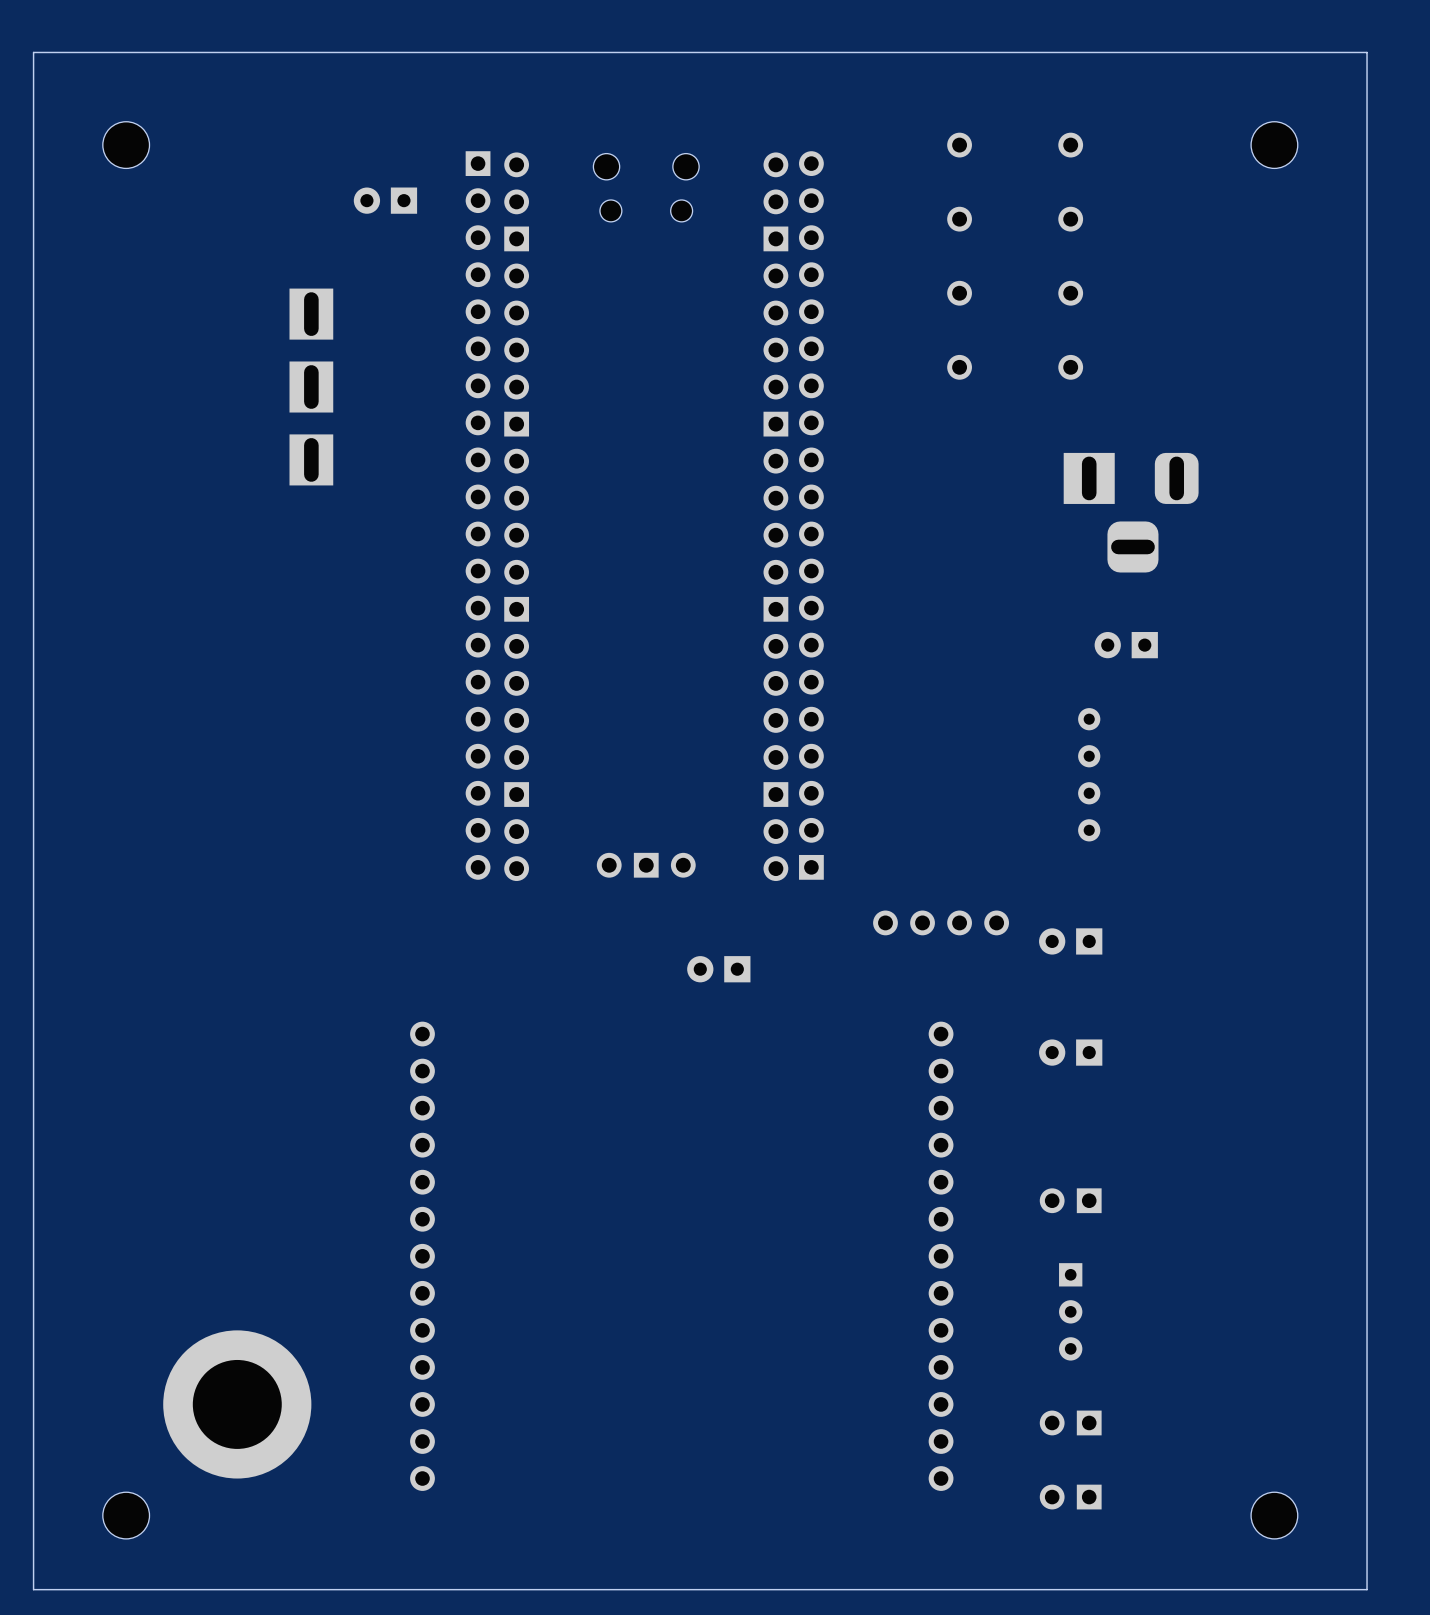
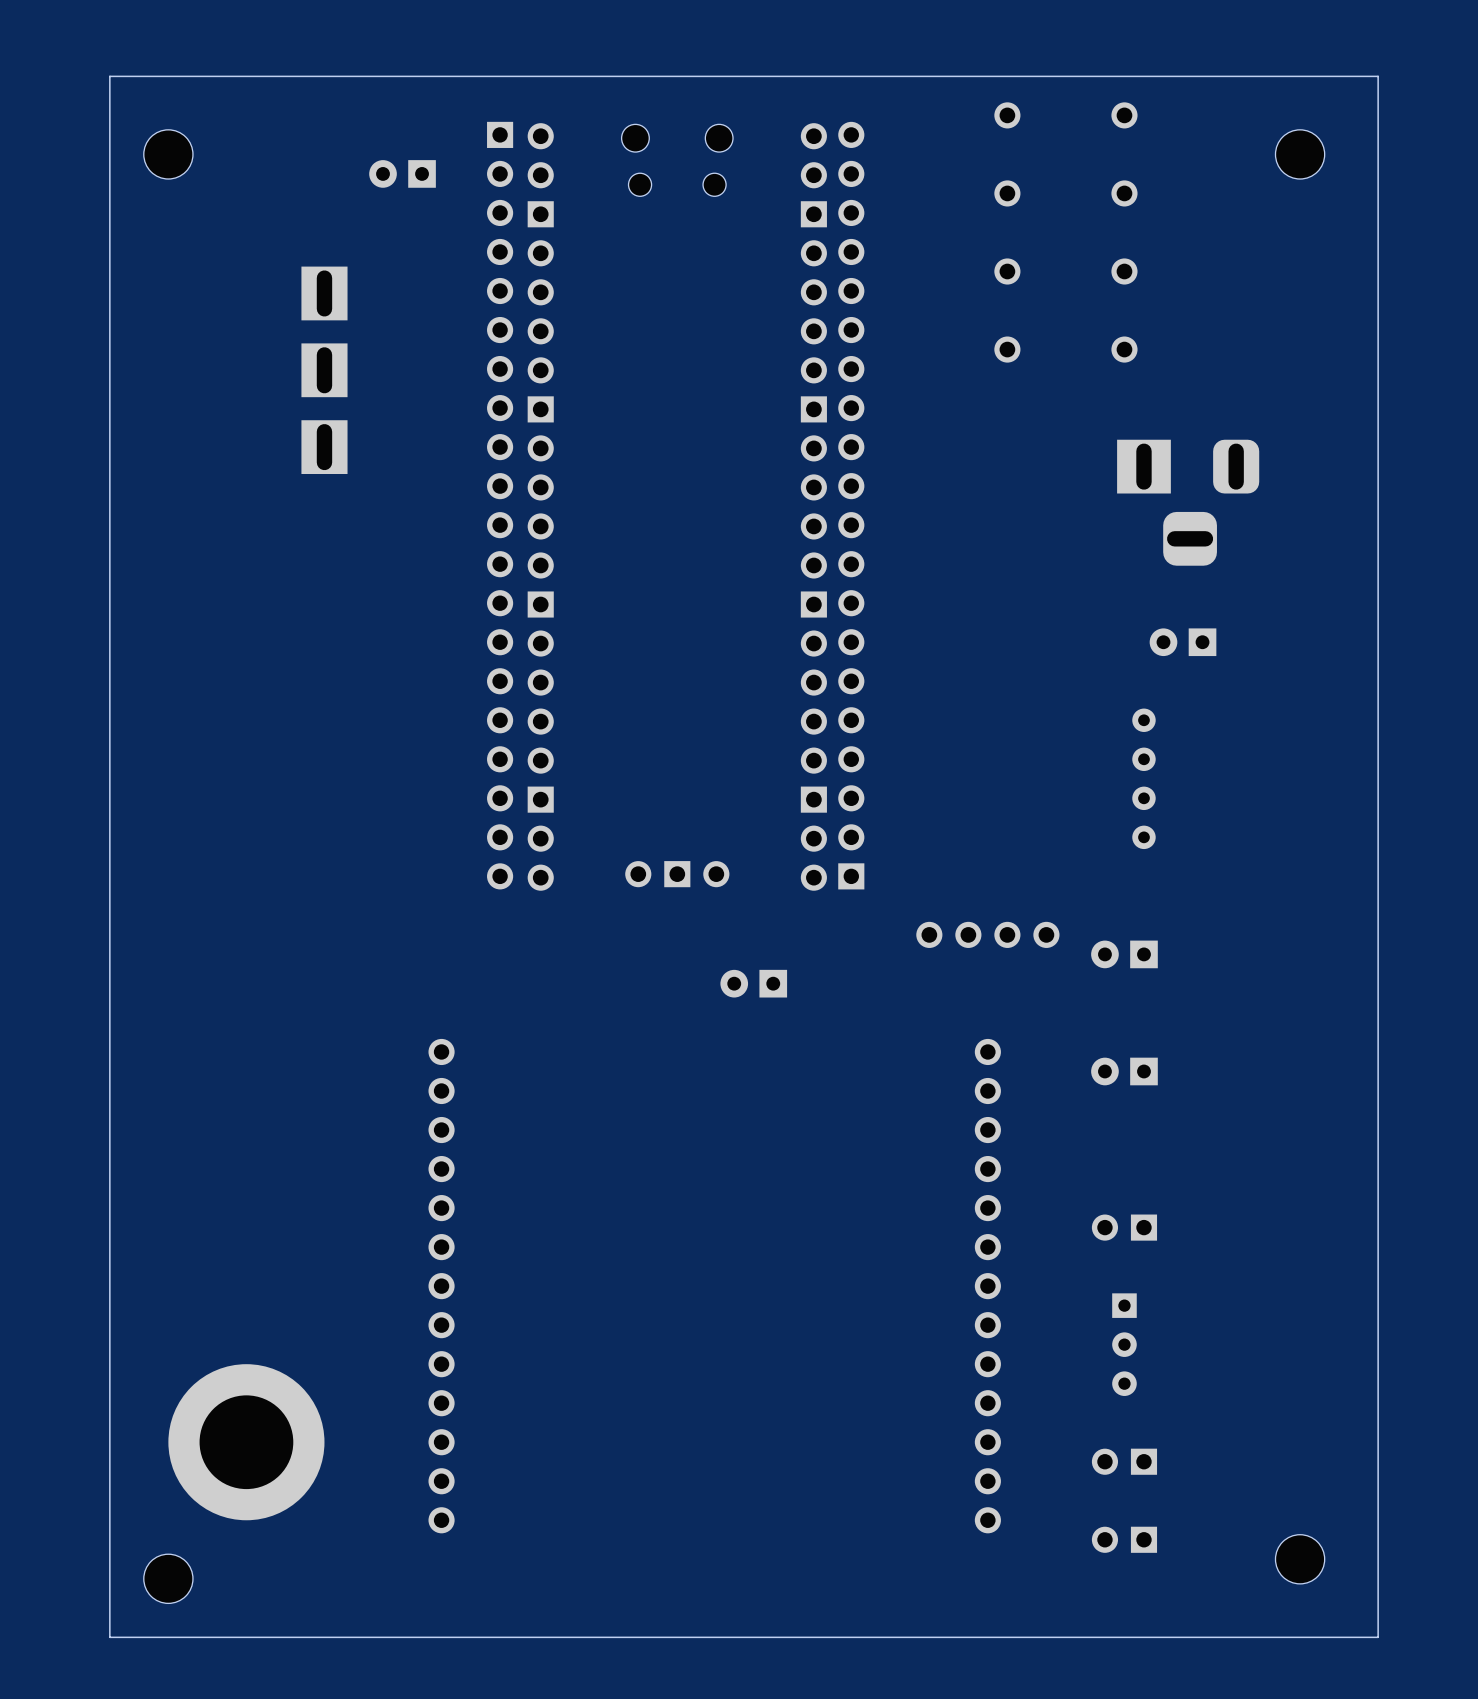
part position: (126, 145) -> (168, 154)
part position: (1274, 145) -> (1300, 154)
part position: (126, 1515) -> (168, 1578)
part position: (1274, 1515) -> (1300, 1559)
board edge: (1311, 1589) (1367, 1589) (1367, 52) (33, 52) (33, 1589) (107, 1589) -> (1378, 1637) (1378, 76) (109, 76) (109, 1637)

